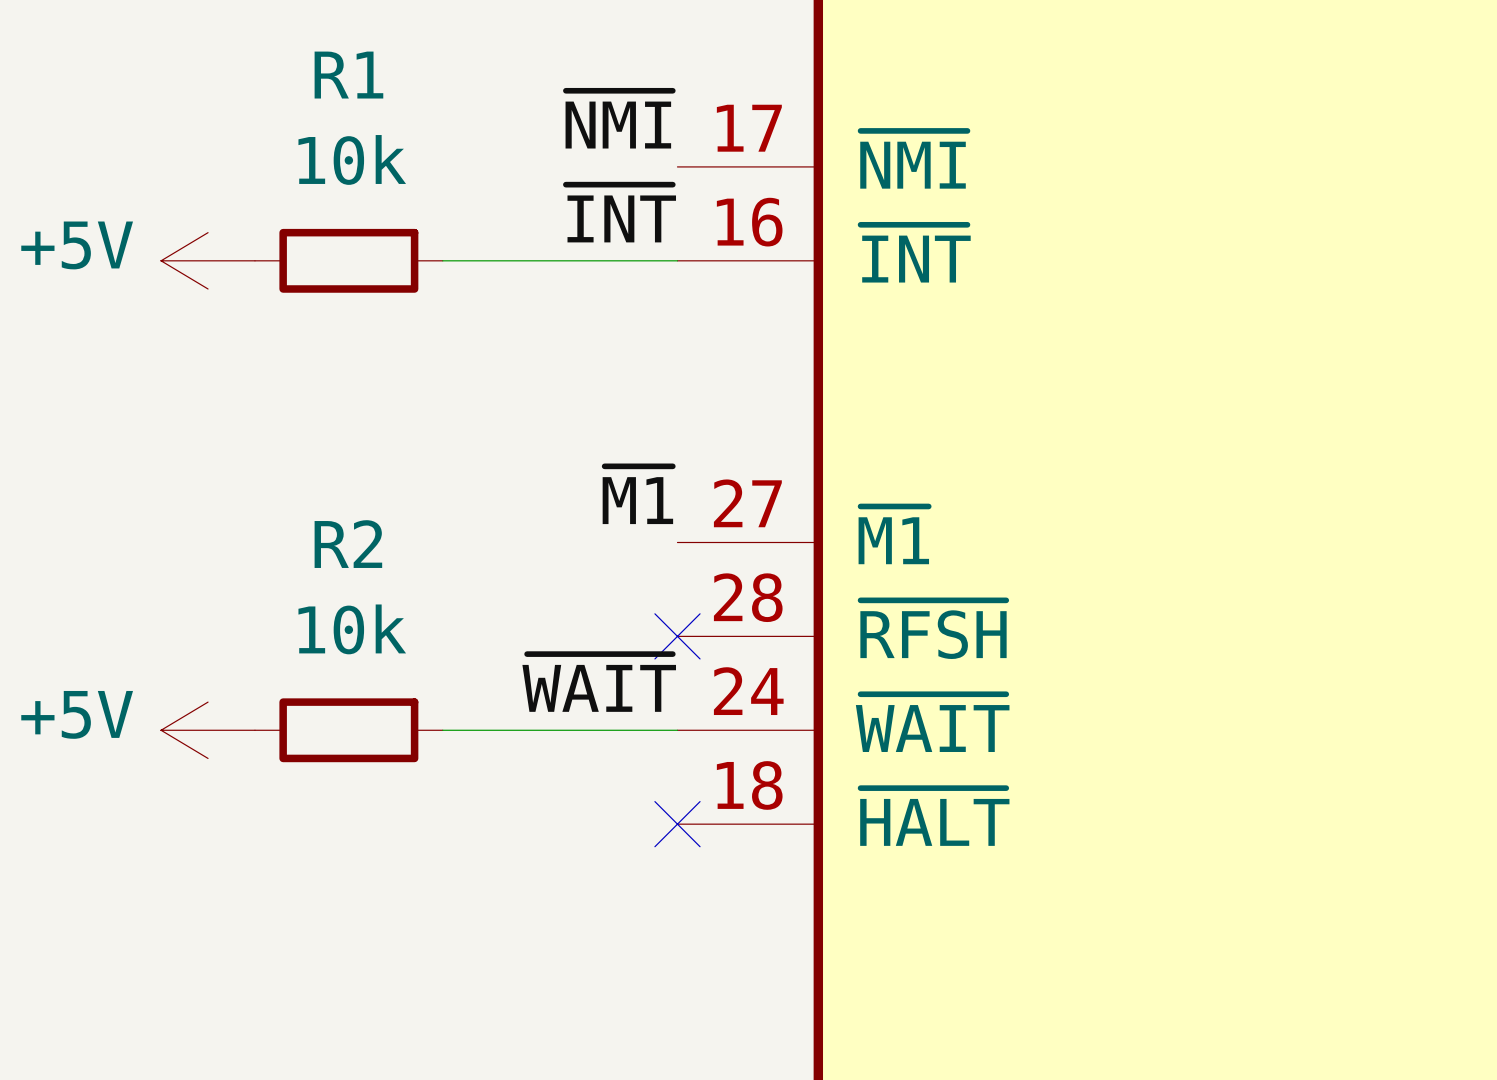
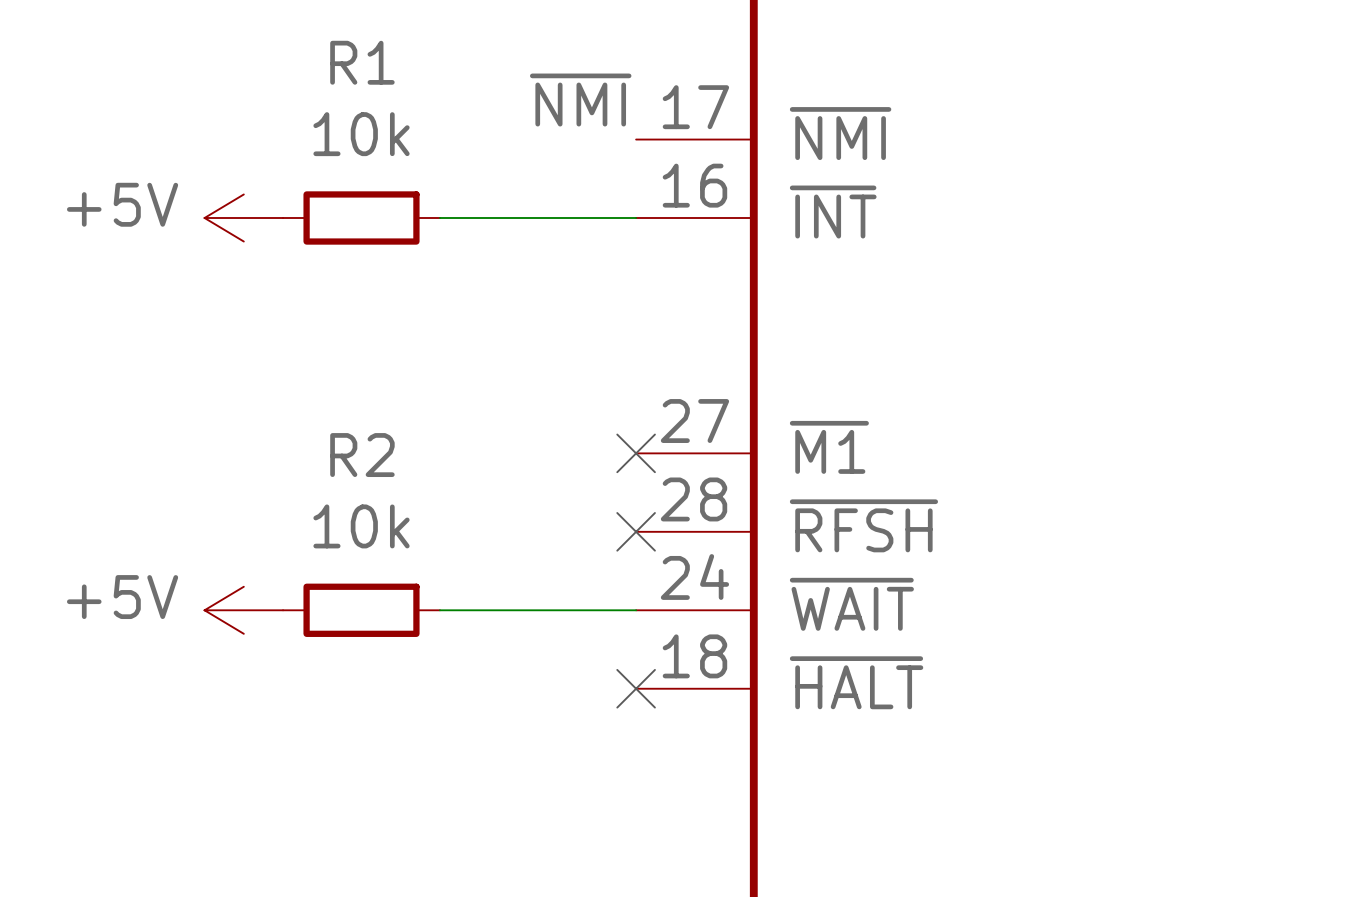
label: ~{INT} (620, 213) -> none
label: ~{M1} (637, 495) -> none
no-connect mark: none -> (636, 453)
label: ~{WAIT} (599, 682) -> none

